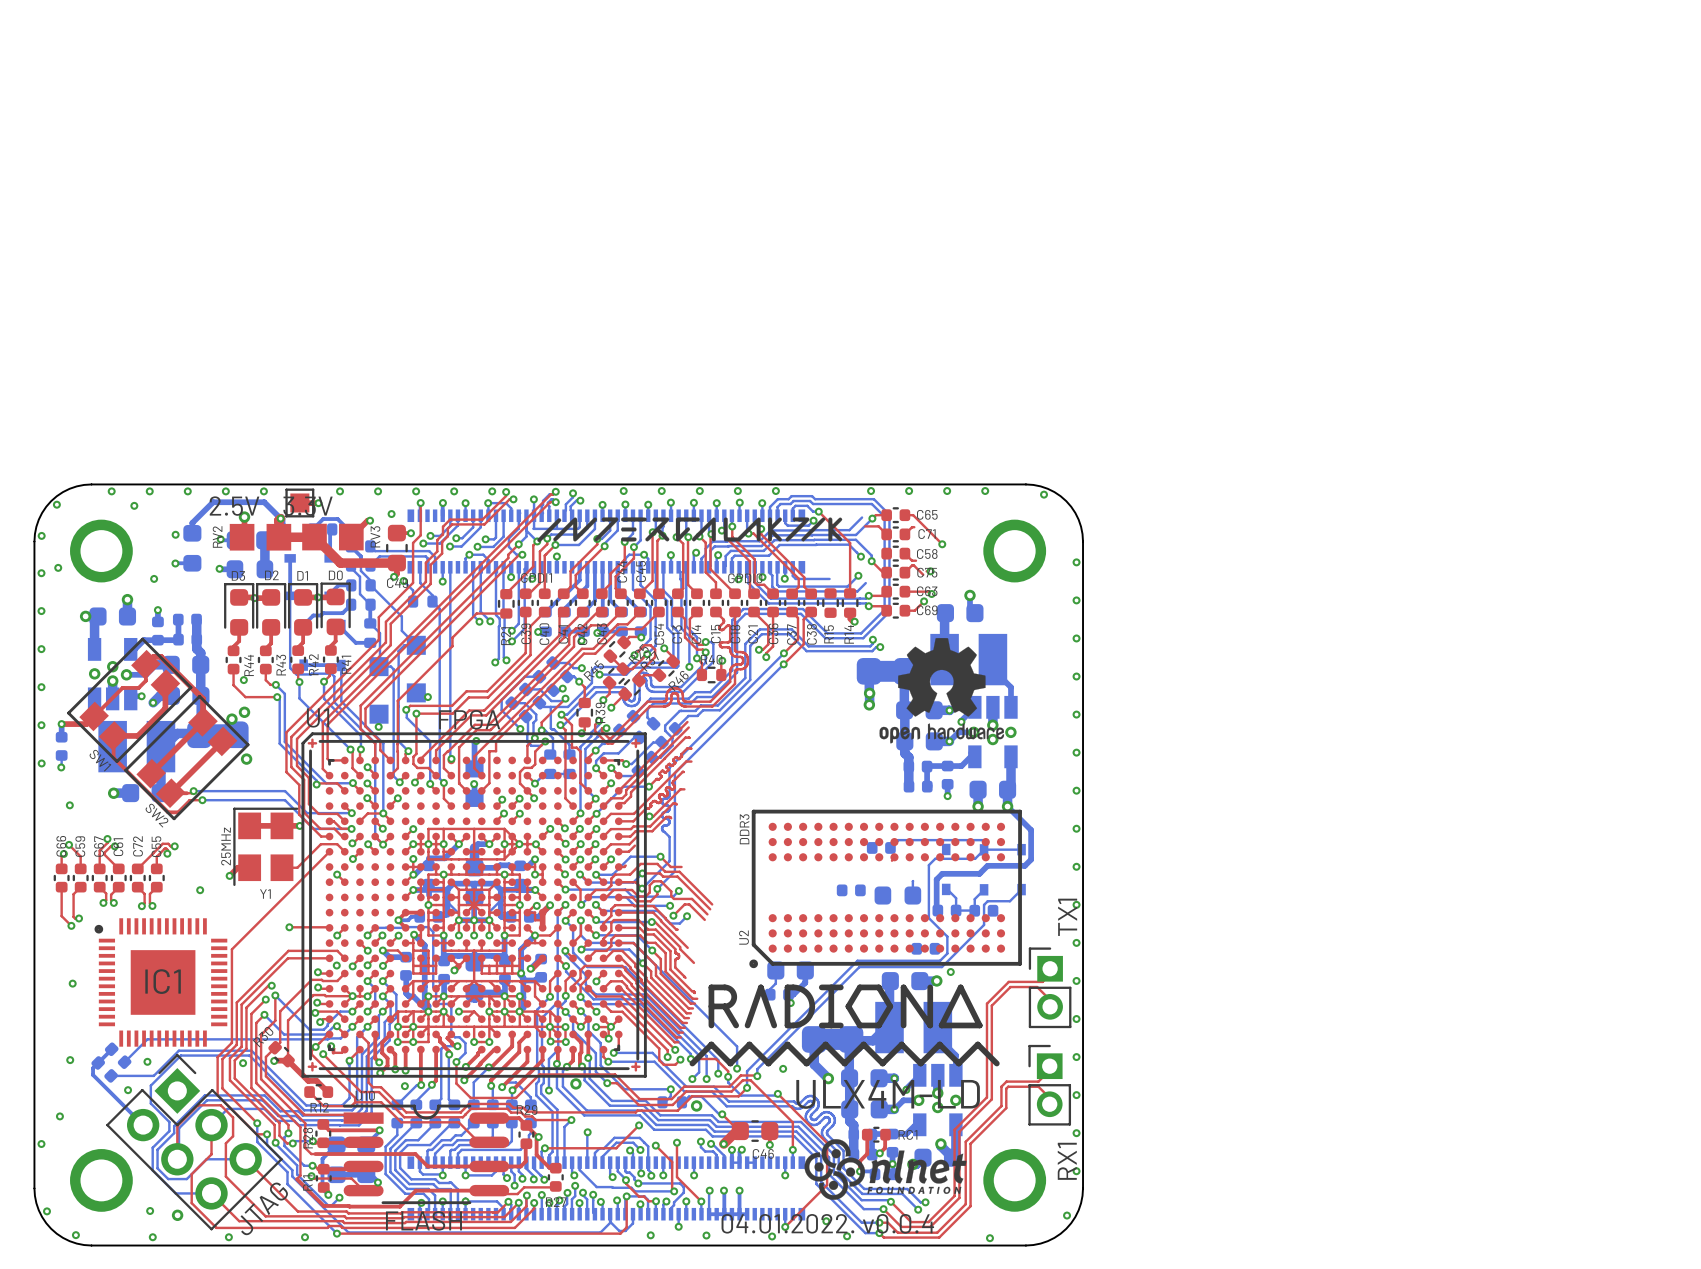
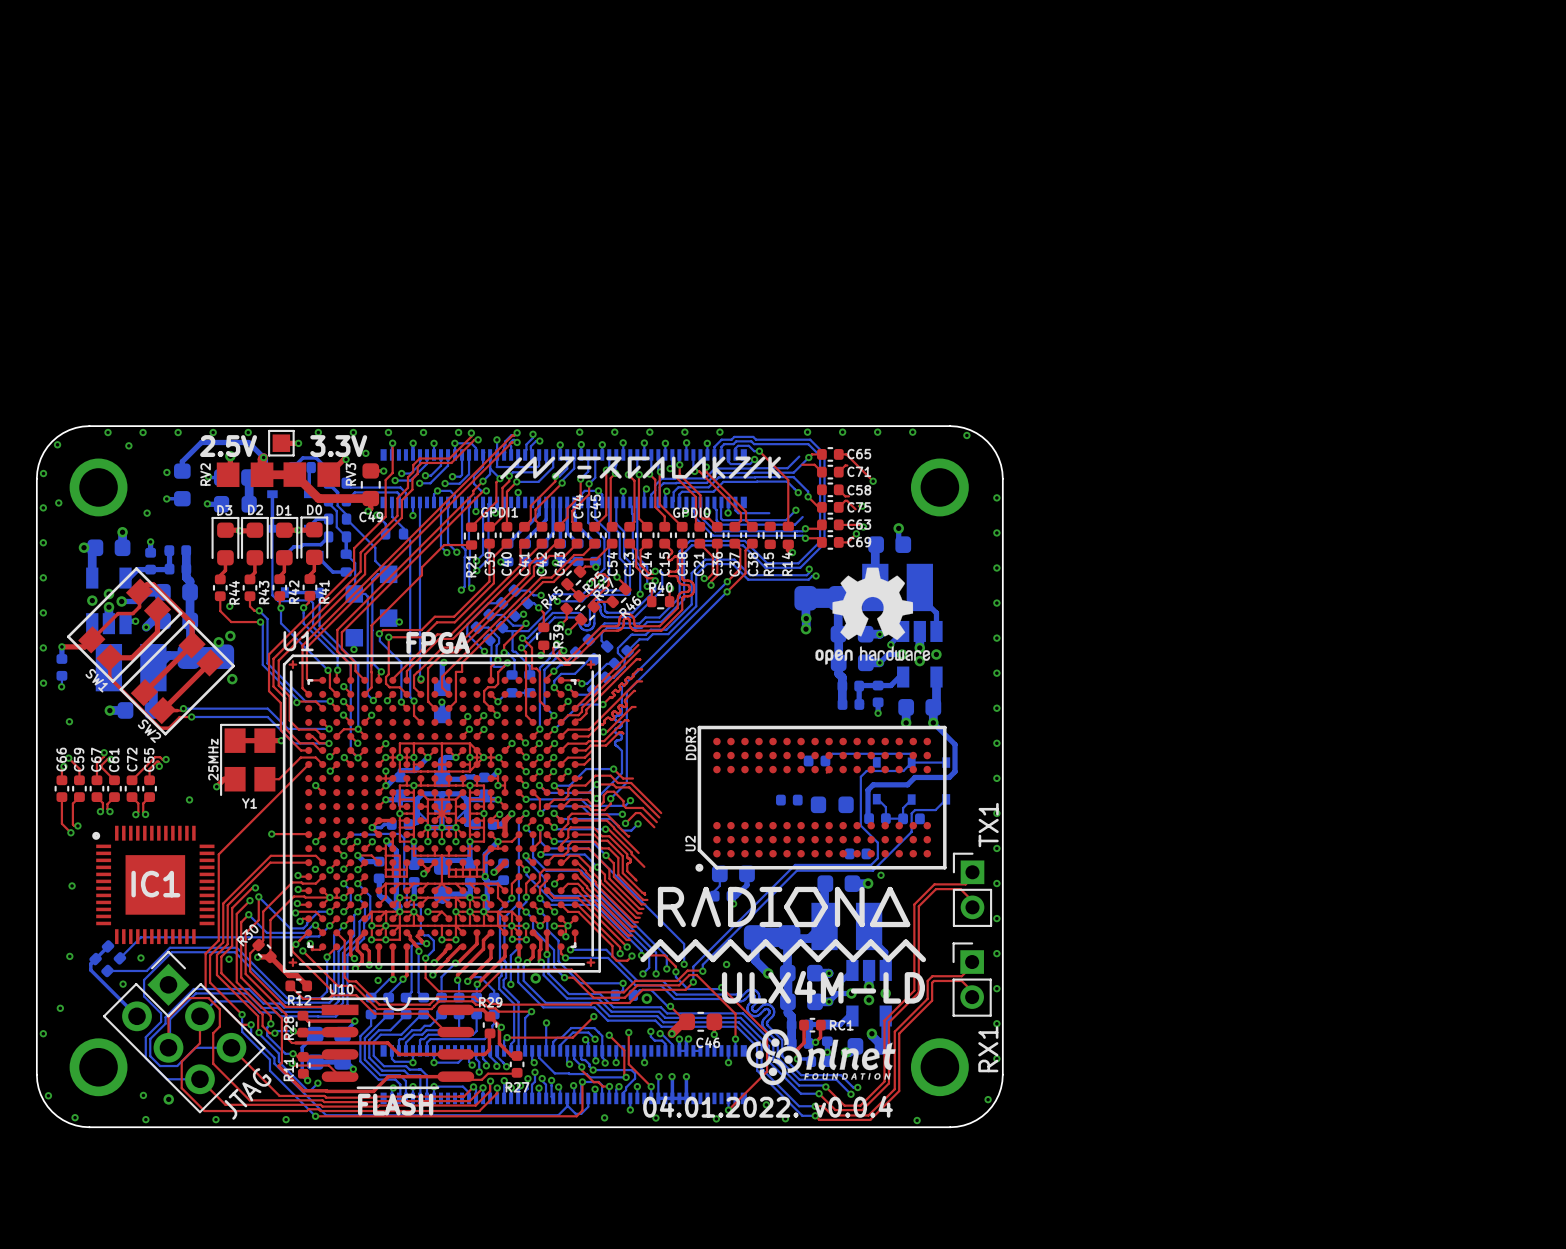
bottom track: (912, 881) (912, 895) -> none

